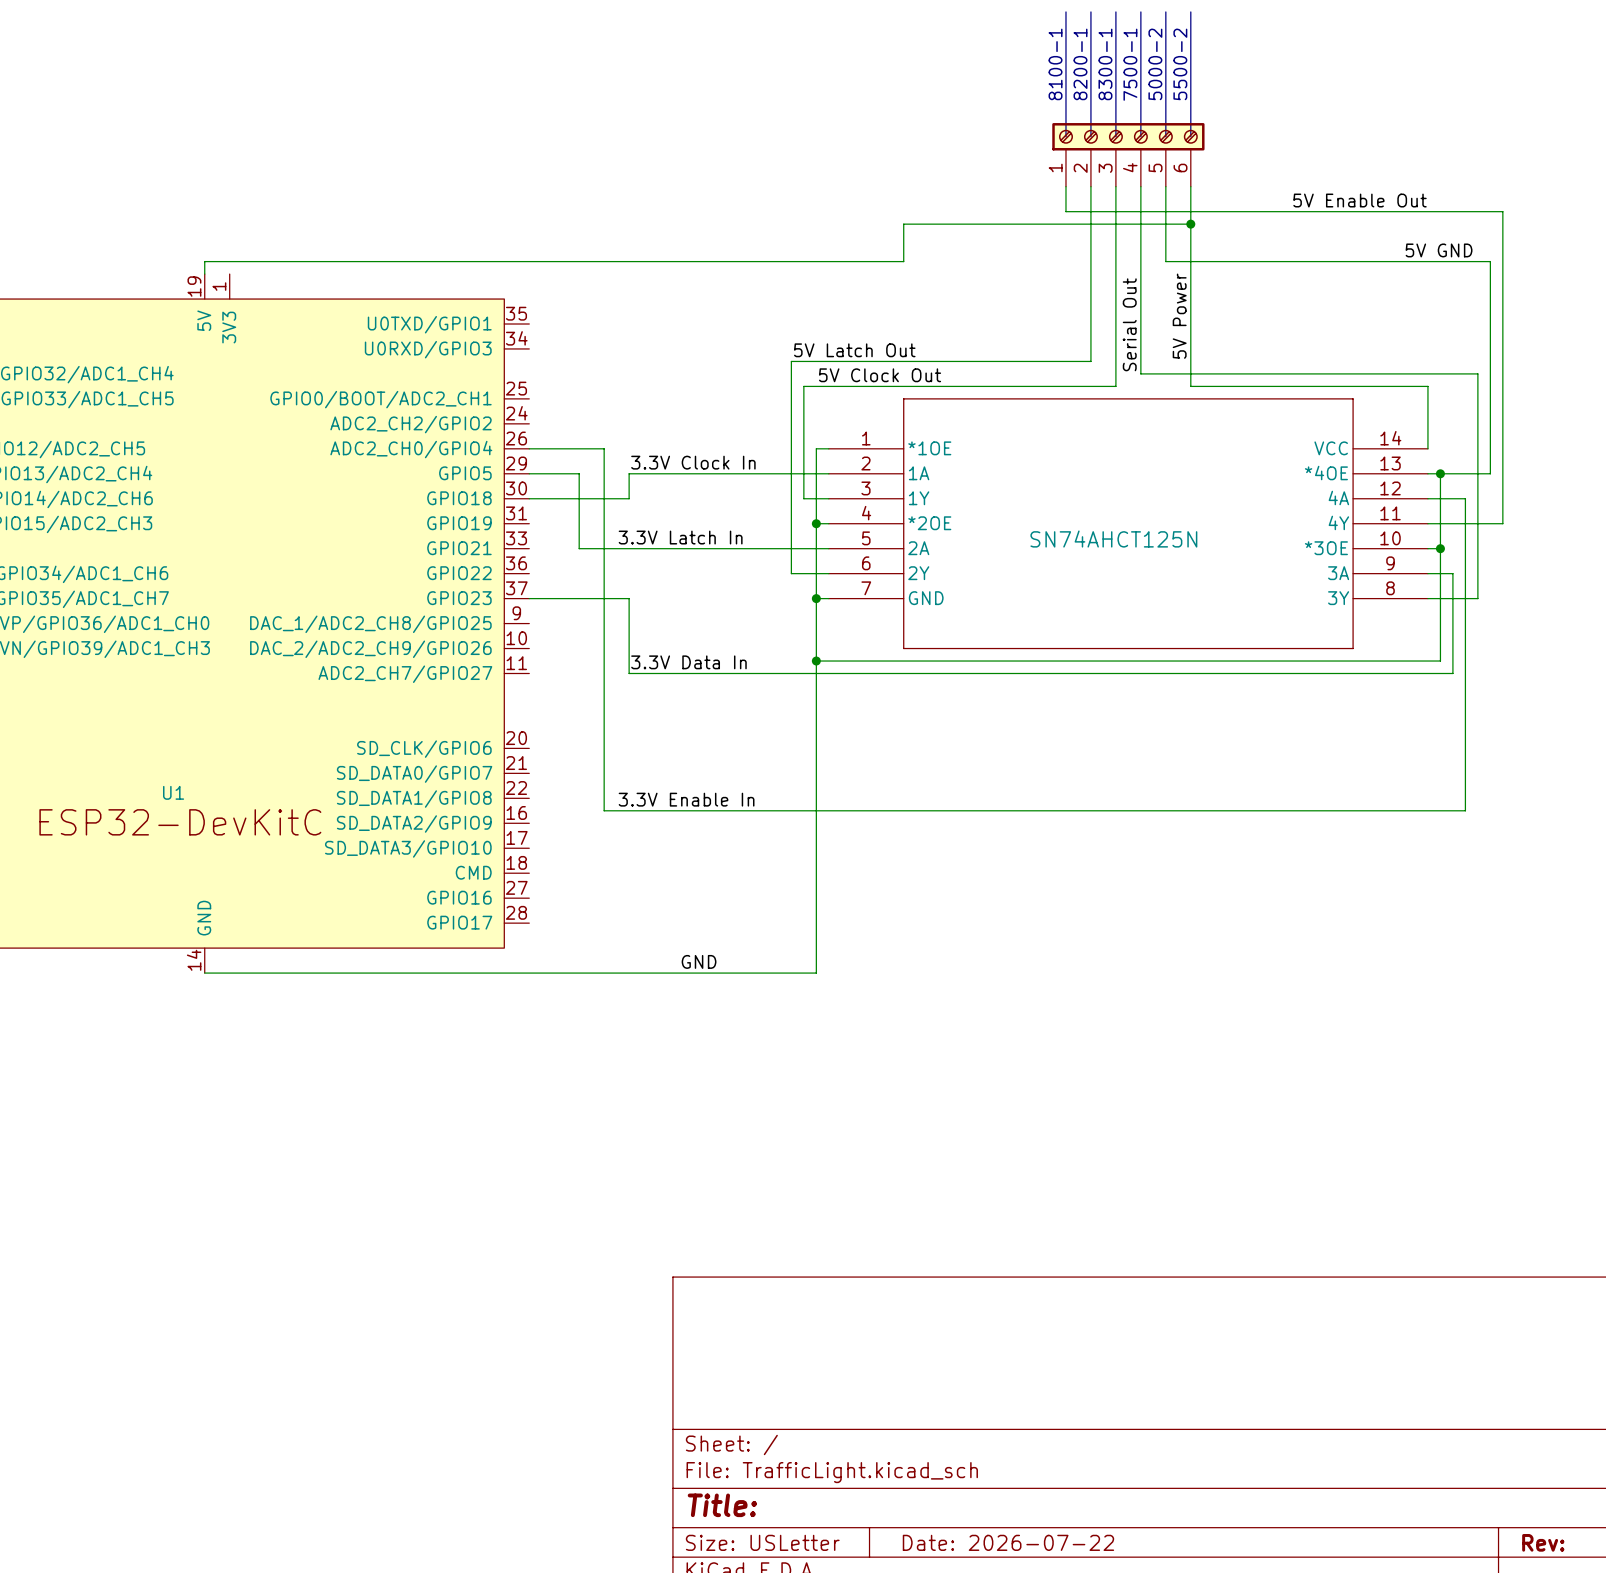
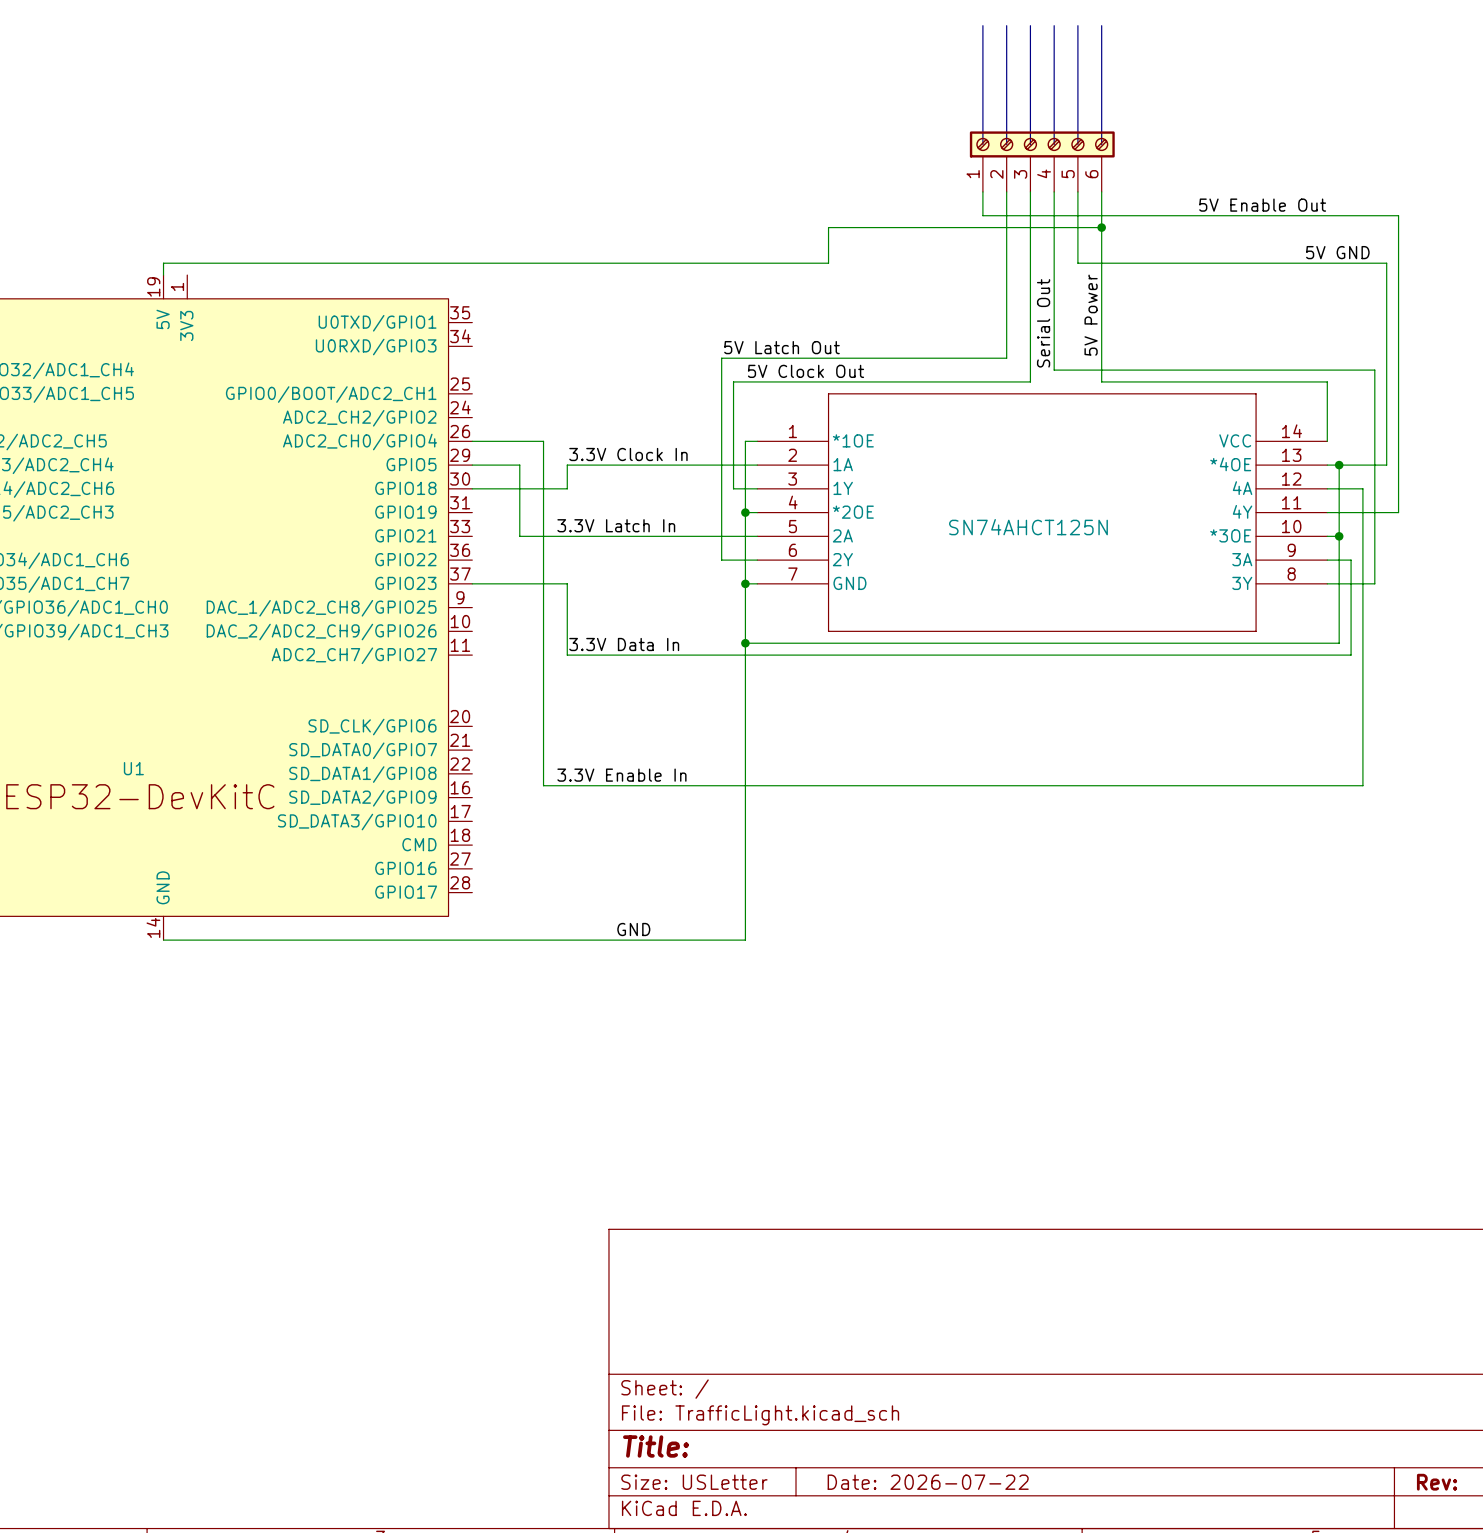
text: 8100-1 (1055, 64) -> none
text: 8200-1 (1080, 64) -> none
text: 8300-1 (1105, 64) -> none
text: 7500-1 (1130, 64) -> none
text: 5000-2 (1155, 64) -> none
text: 5500-2 (1180, 64) -> none

